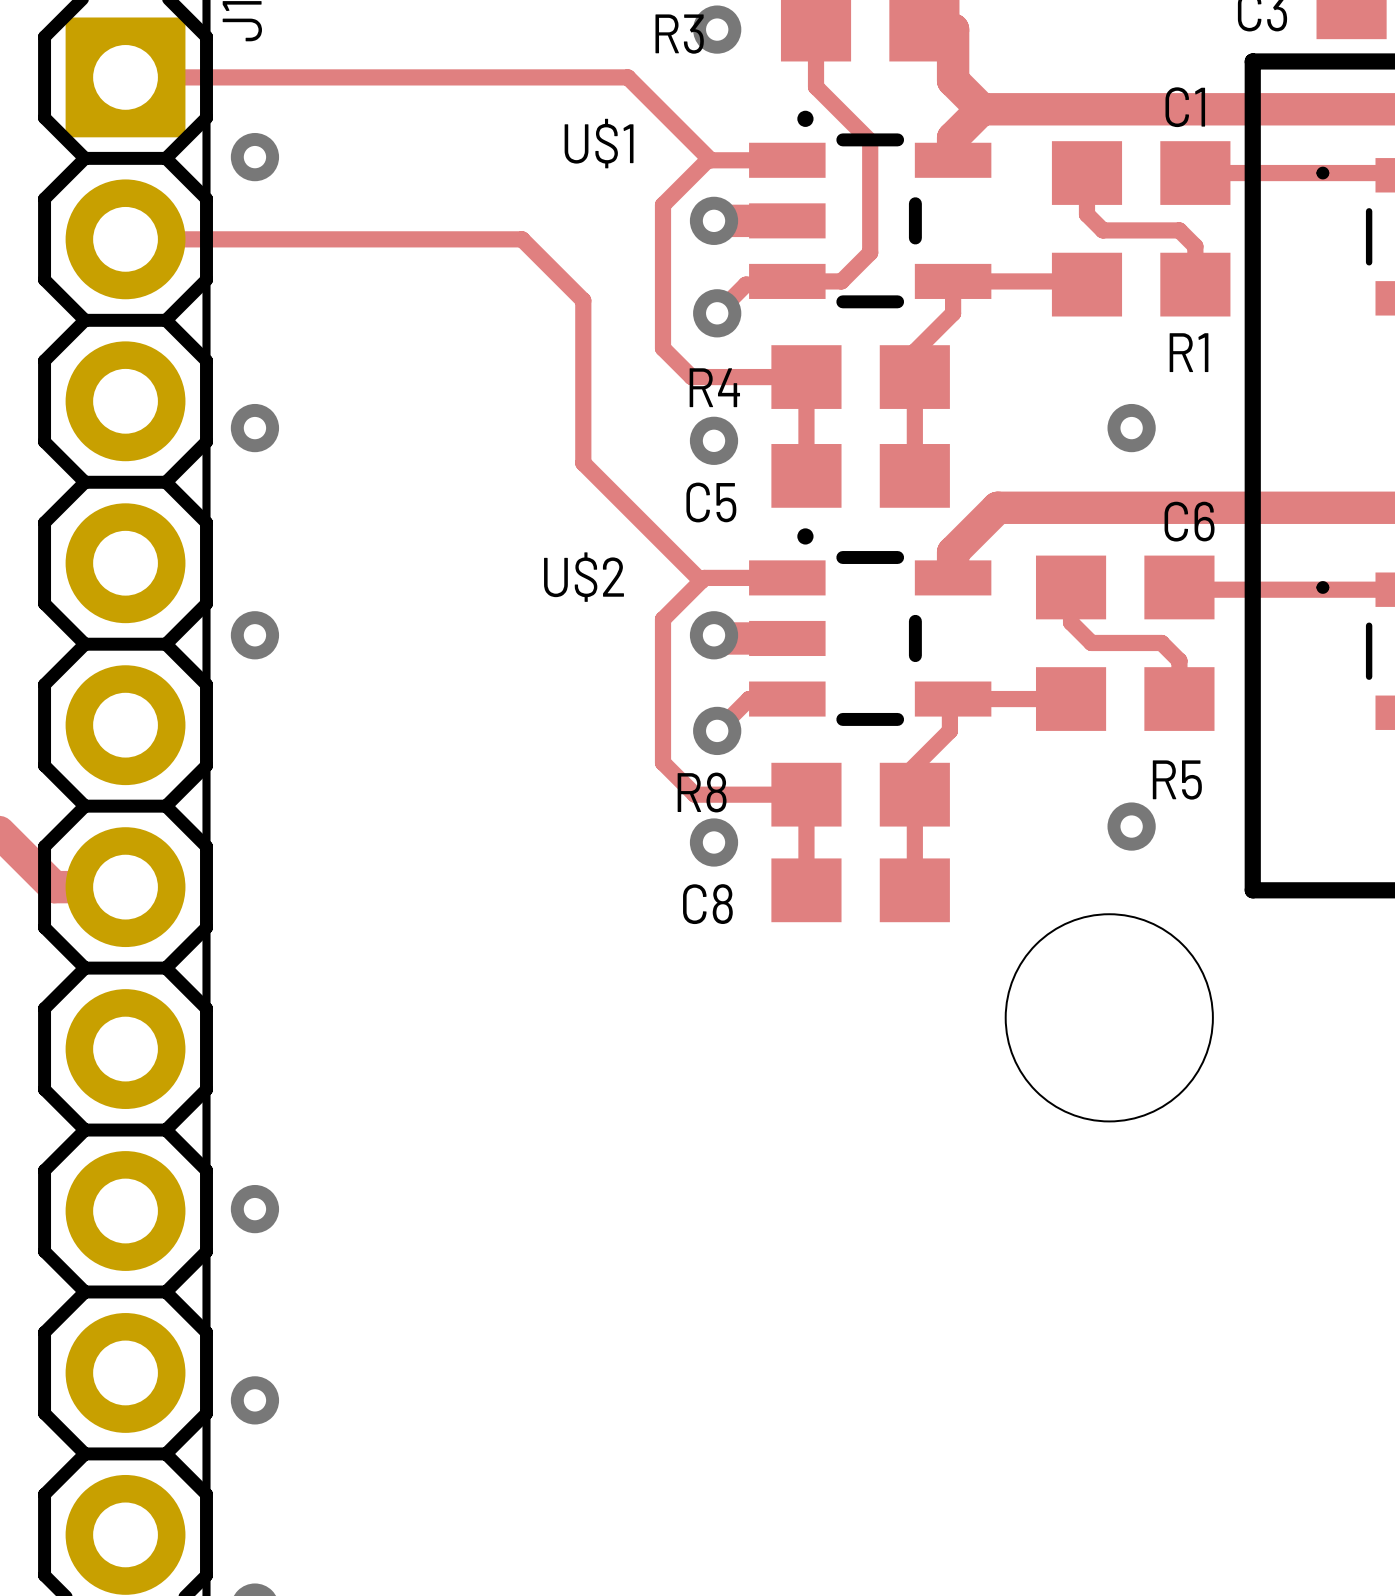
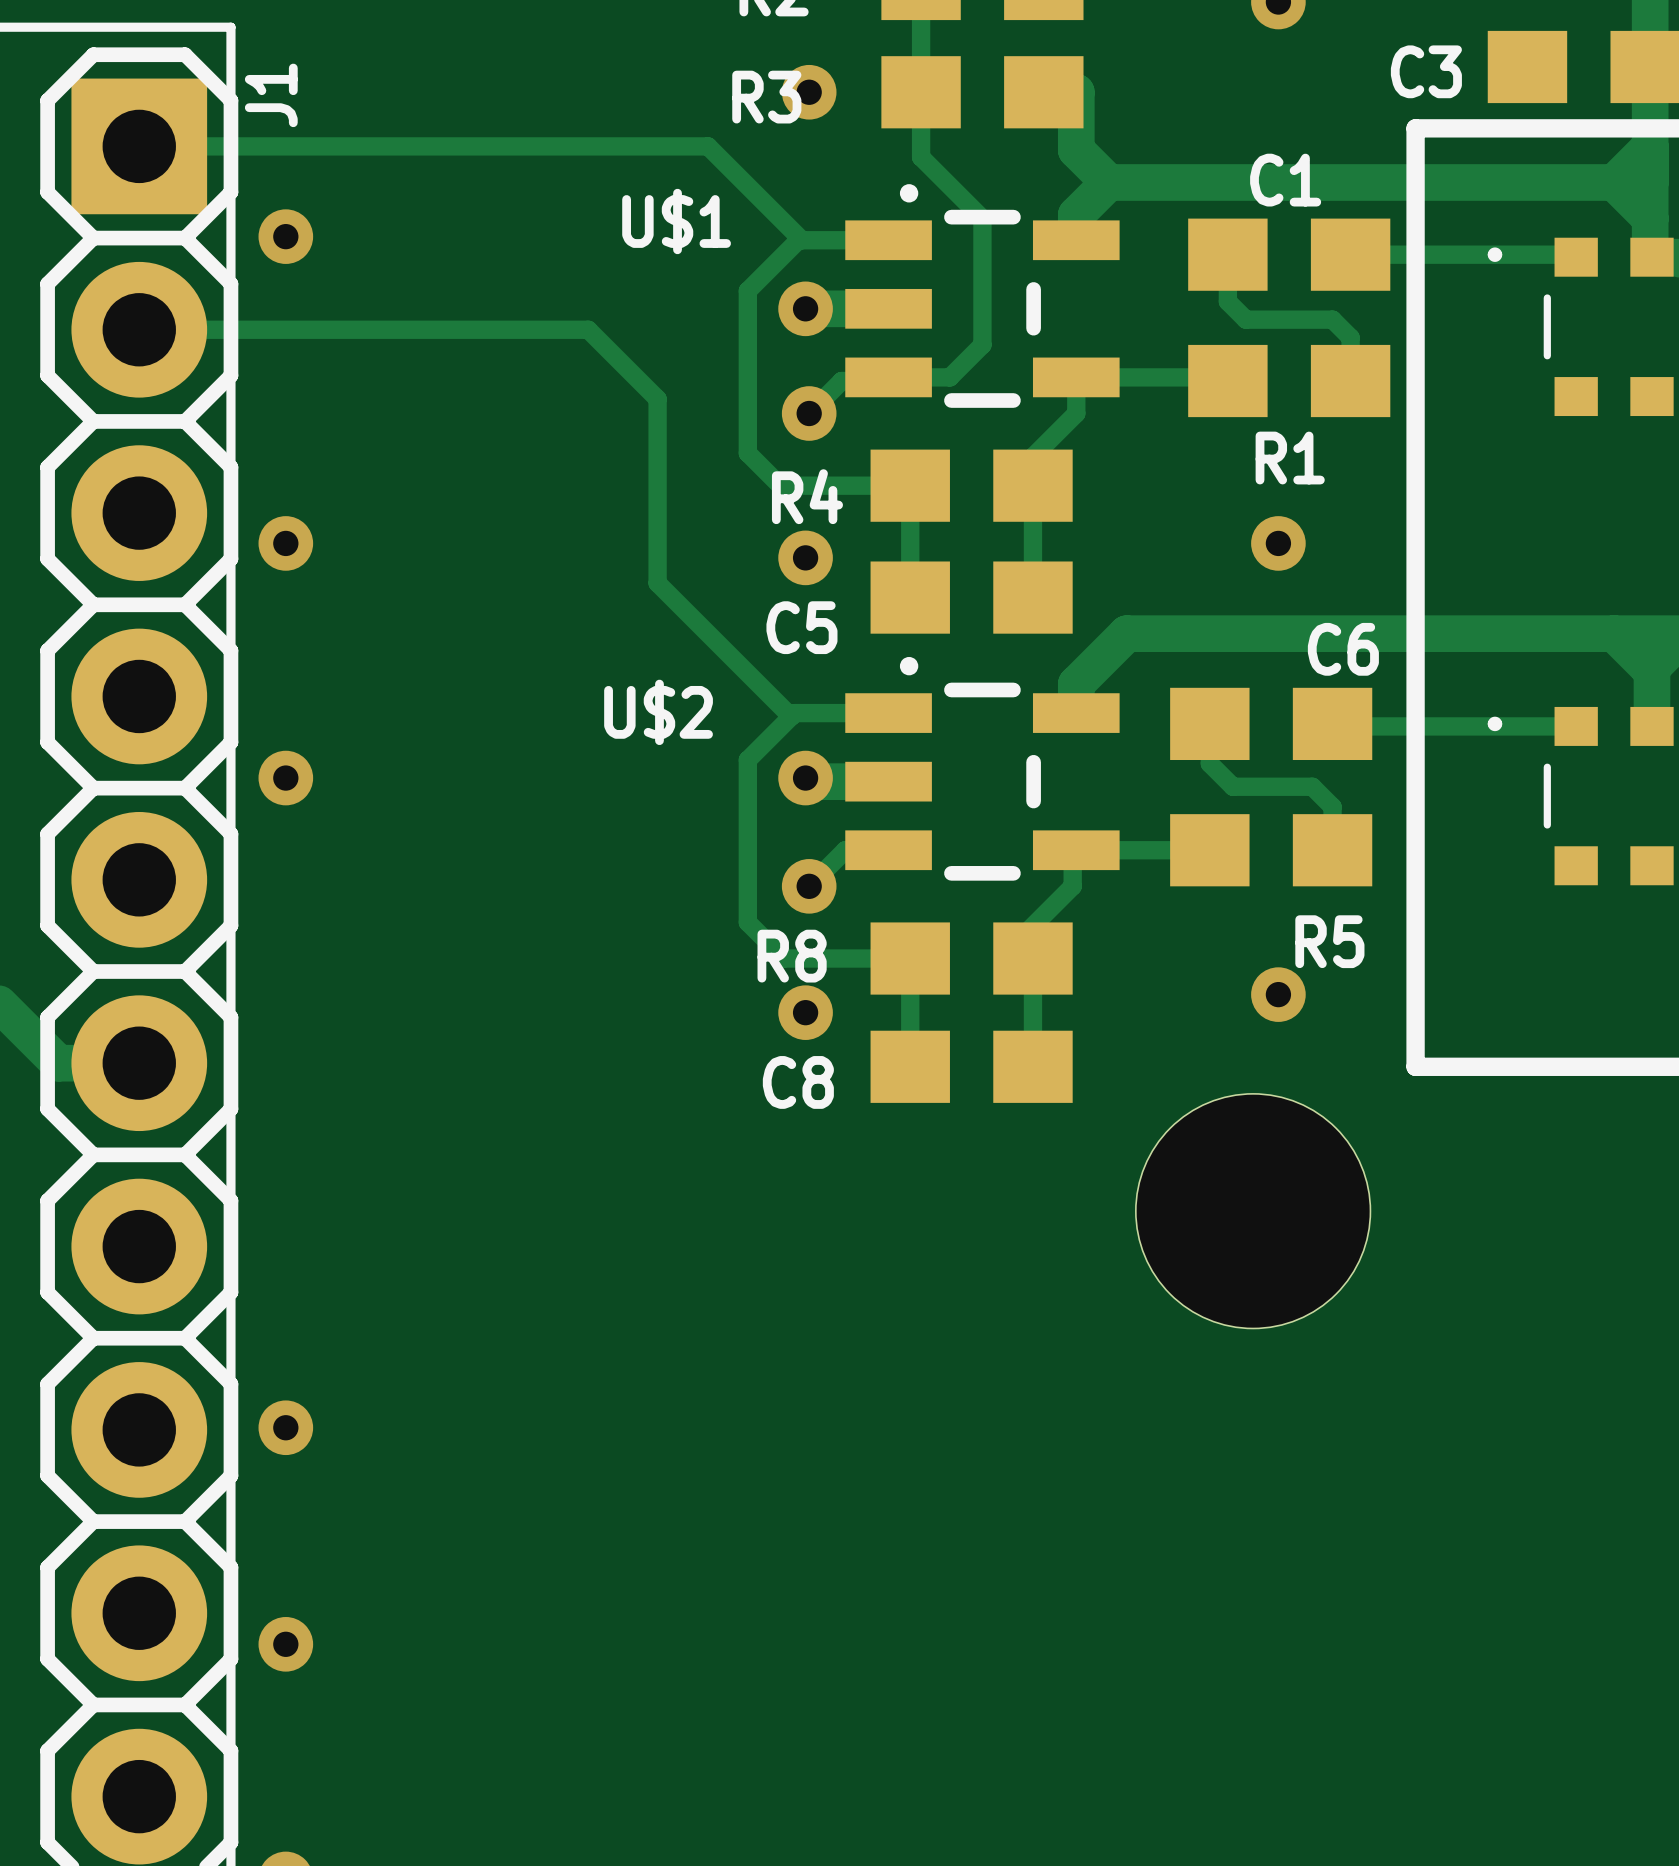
C1 name position: C1 (1185, 107) -> C1 (1285, 180)
R1 name position: R1 (1189, 352) -> R1 (1290, 458)

